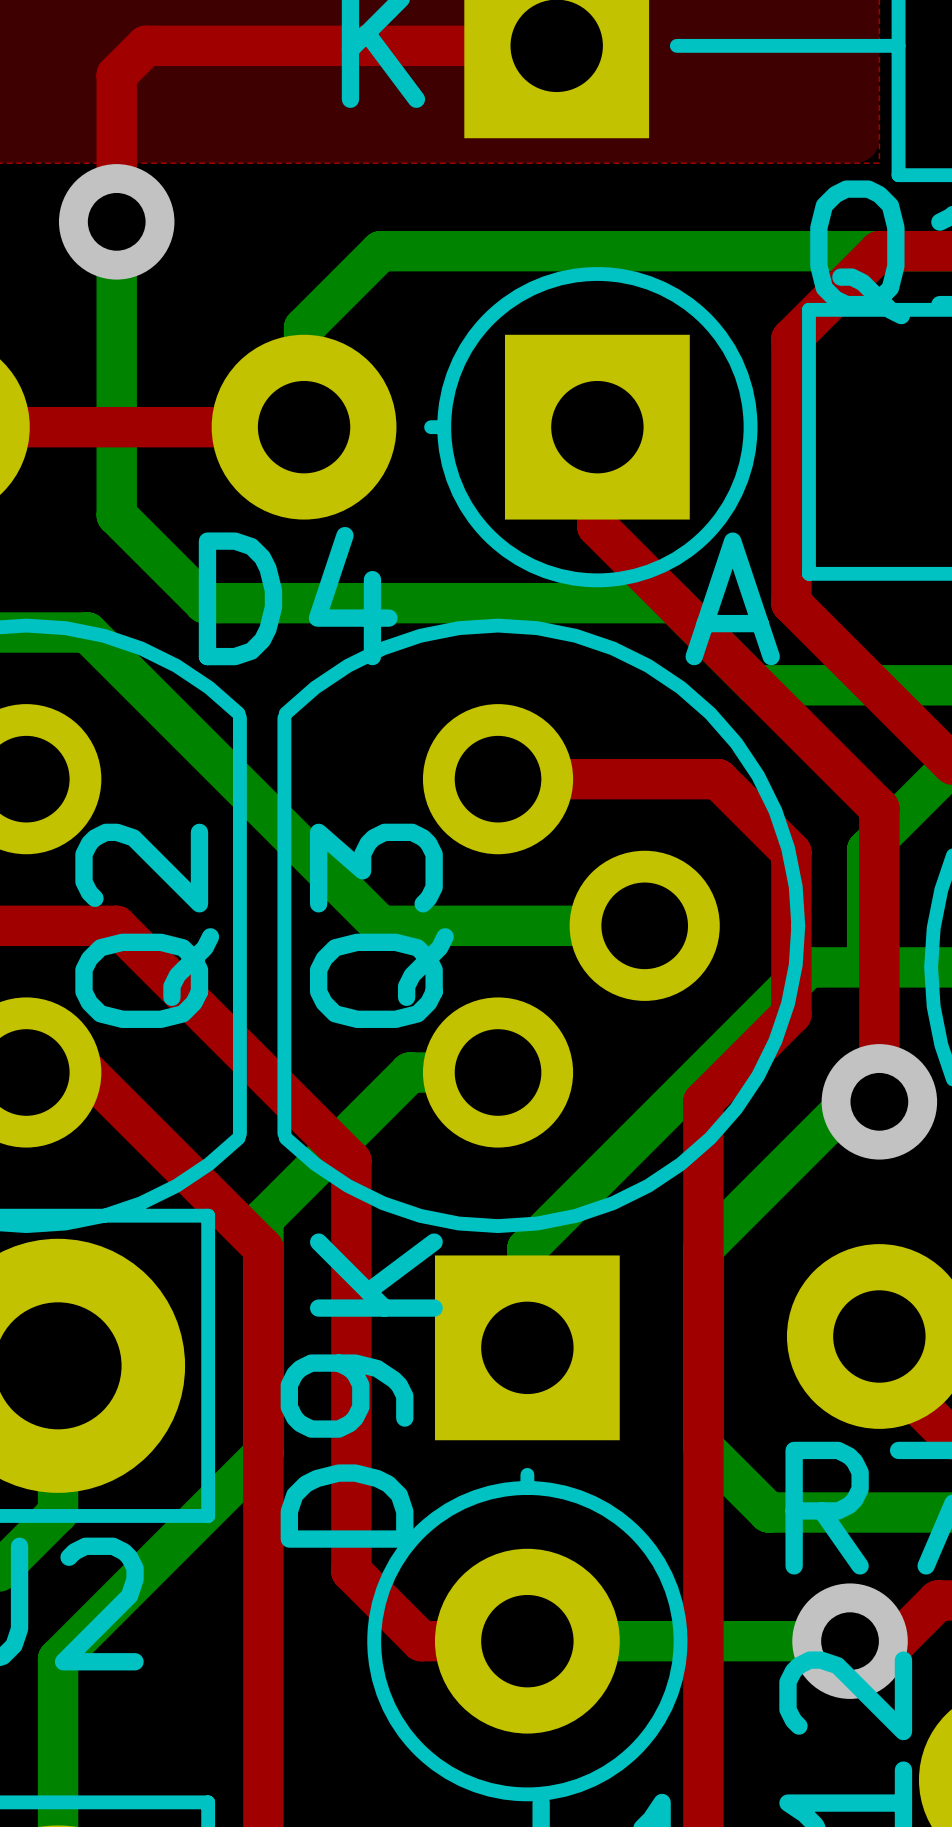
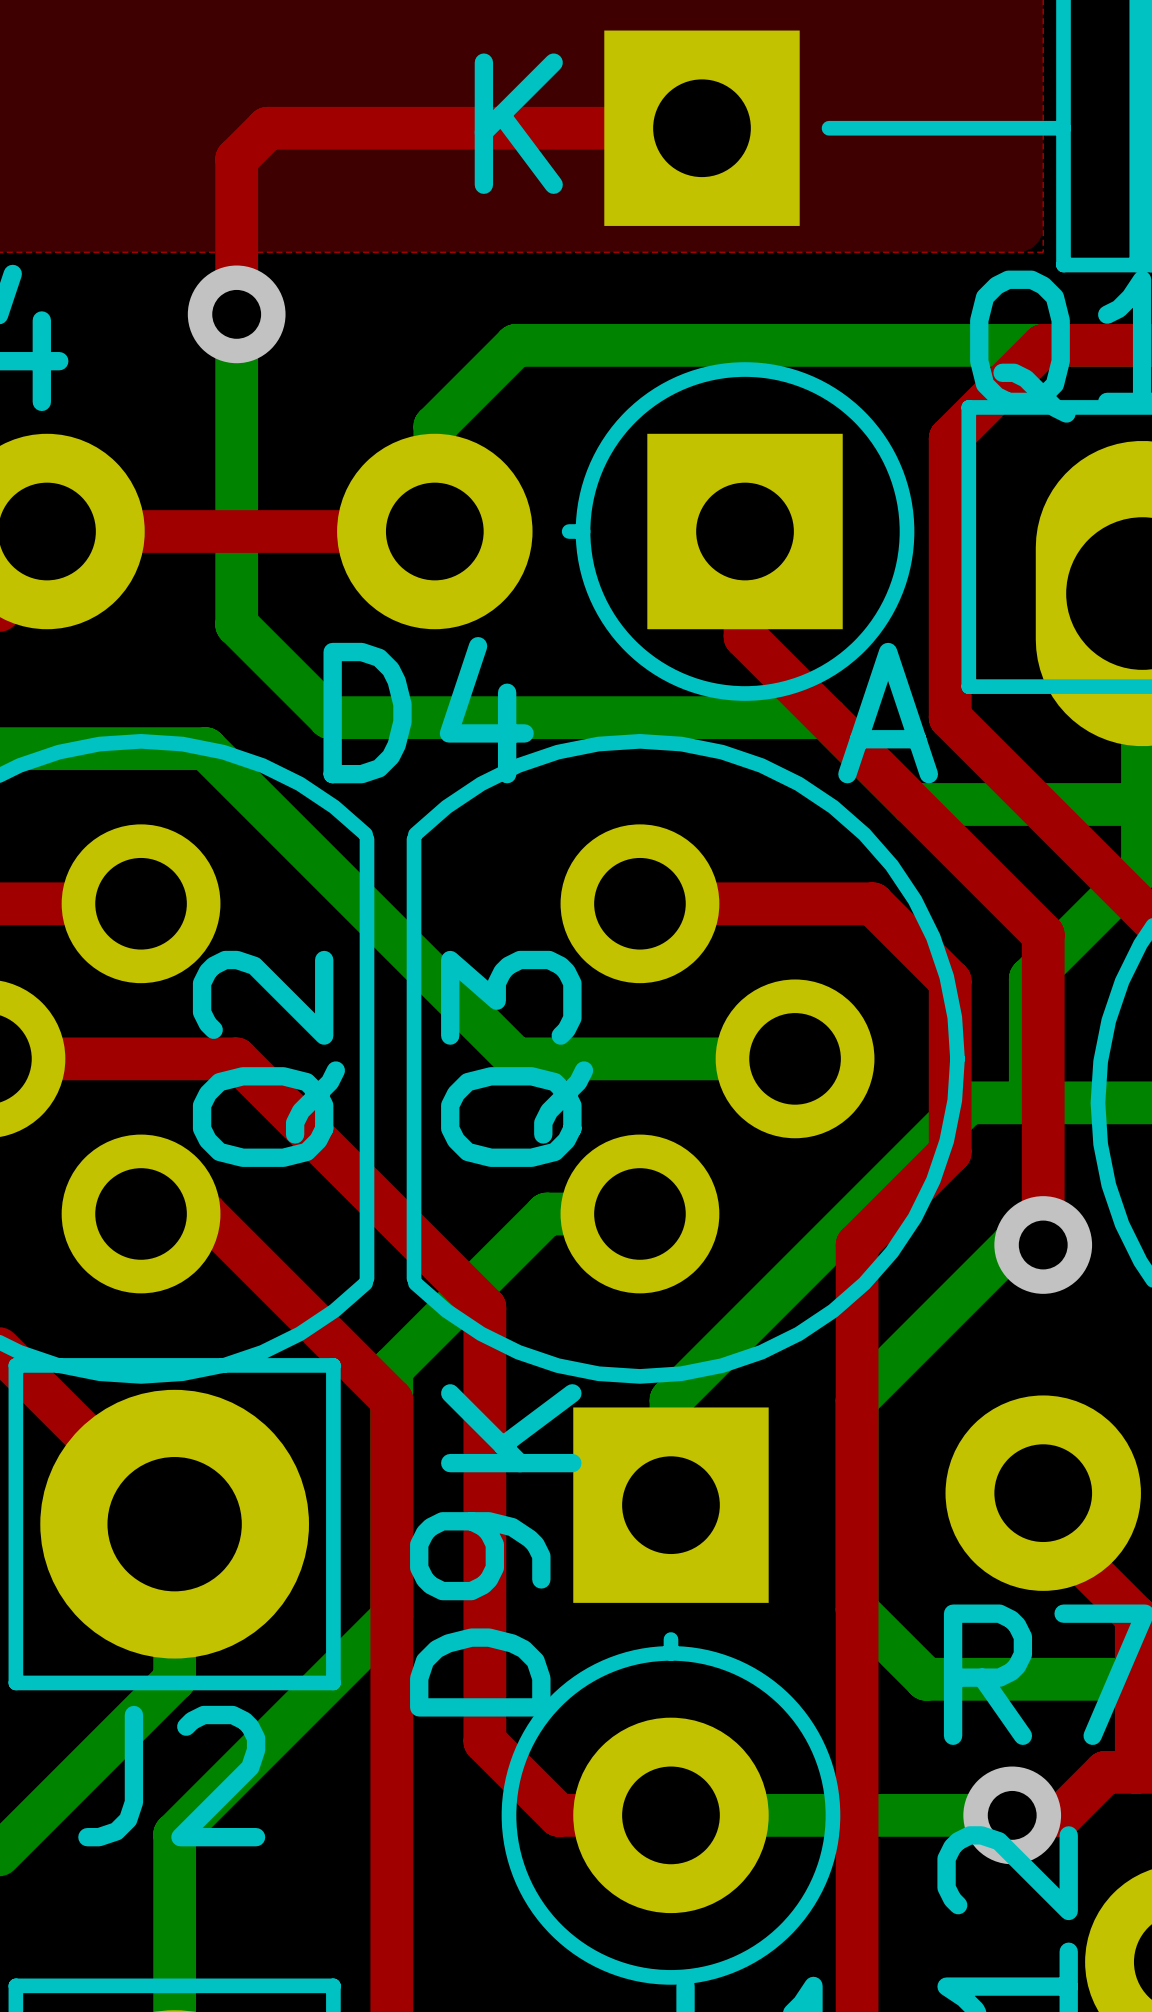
via size: [58, 164, 175, 280] -> [187, 265, 286, 364]
via size: [821, 1044, 938, 1160] -> [994, 1196, 1093, 1294]
via size: [792, 1583, 908, 1699] -> [963, 1766, 1062, 1865]

